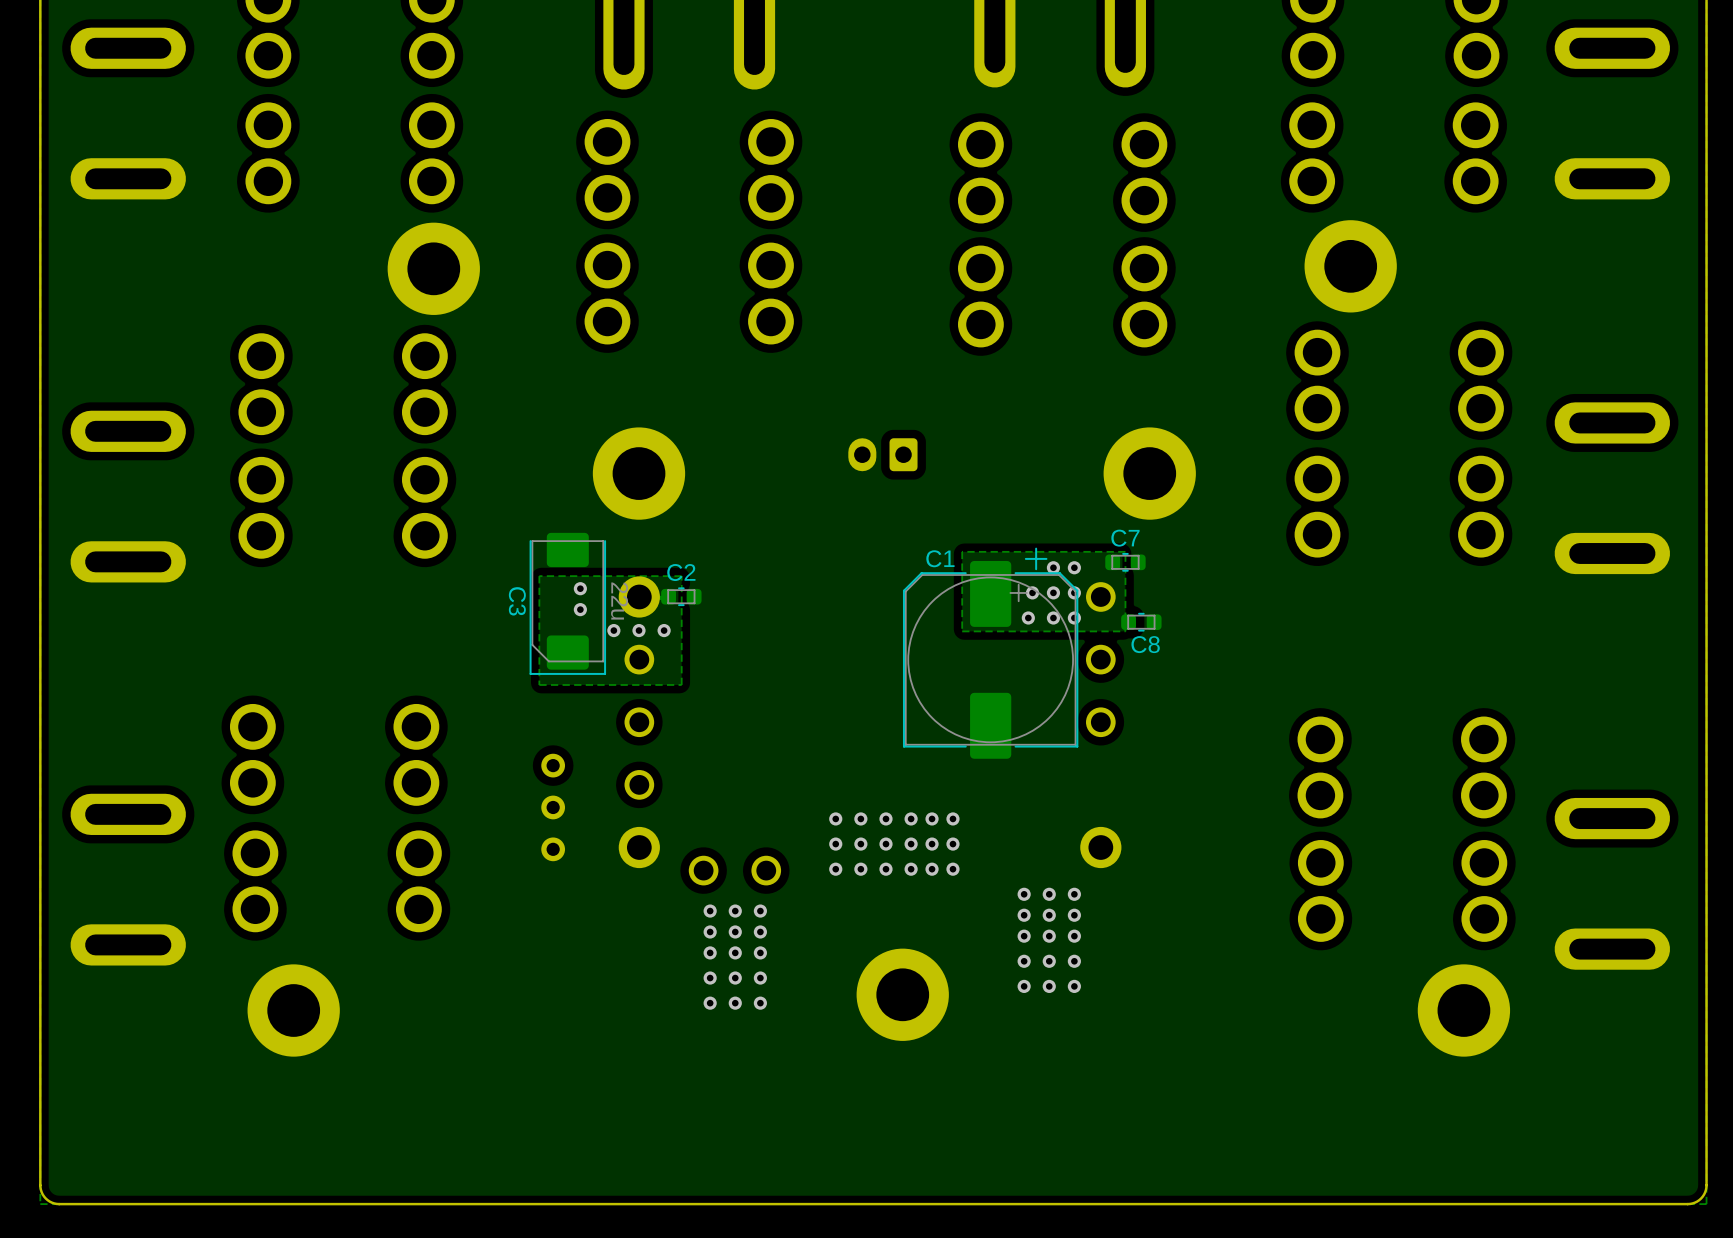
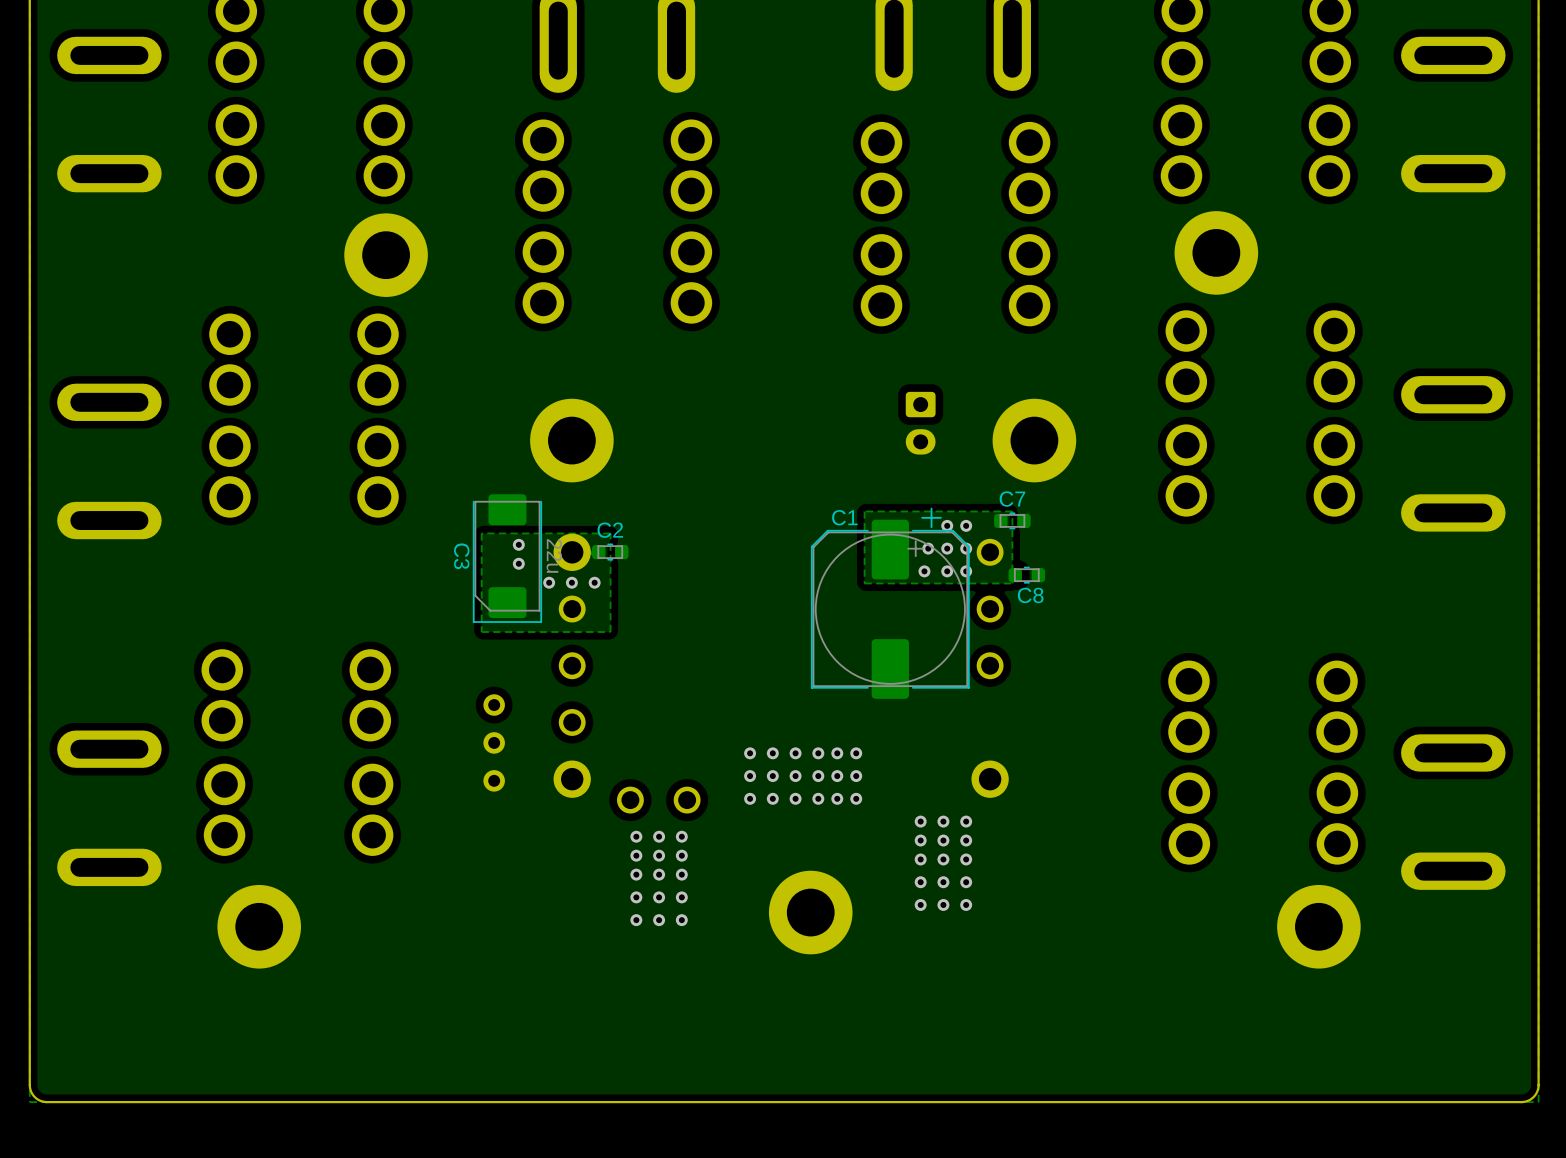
part rotation: 0° (882, 454) -> 90° counterclockwise (920, 423)
part position: (882, 454) -> (920, 423)

